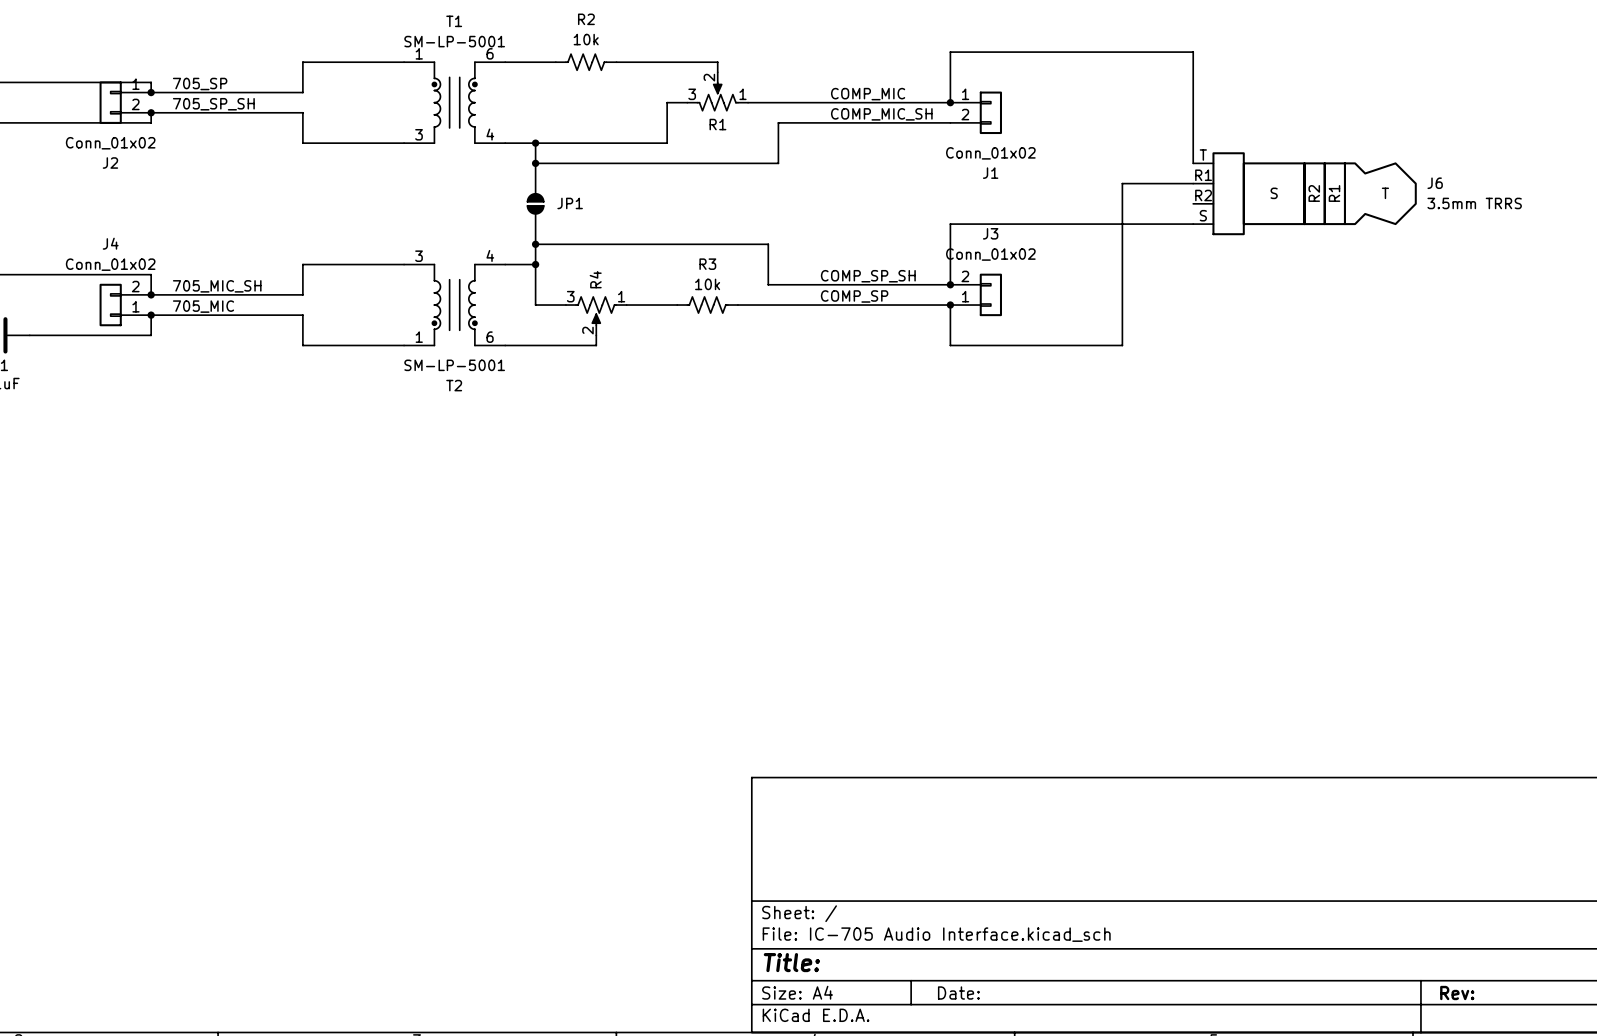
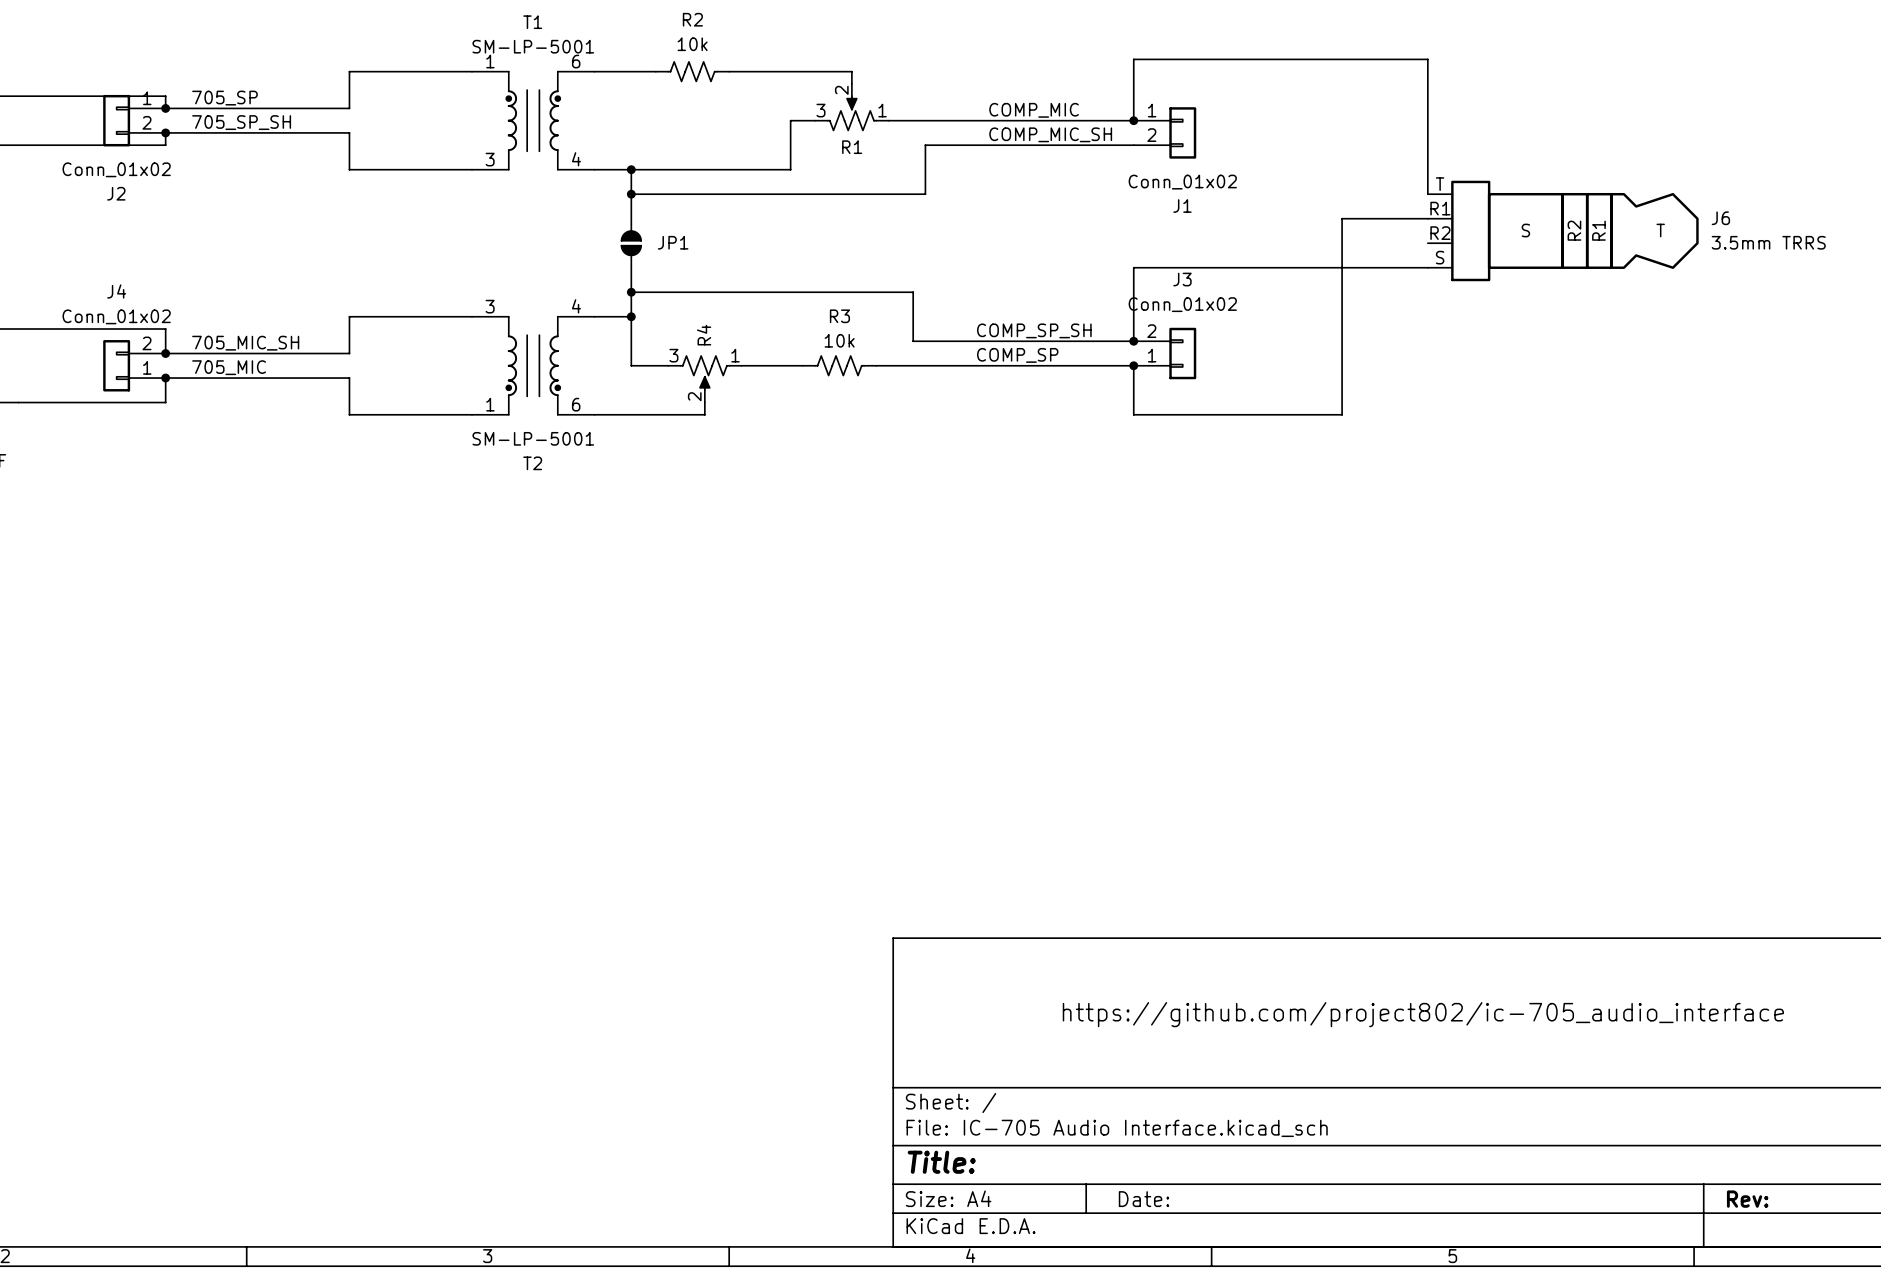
text: none -> https://github.com/project802/ic-705_audio_interface (1423, 1014)

